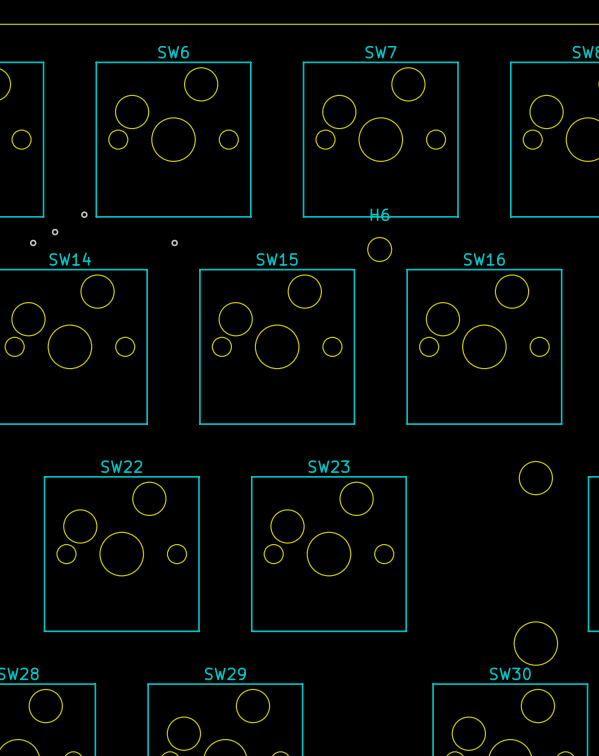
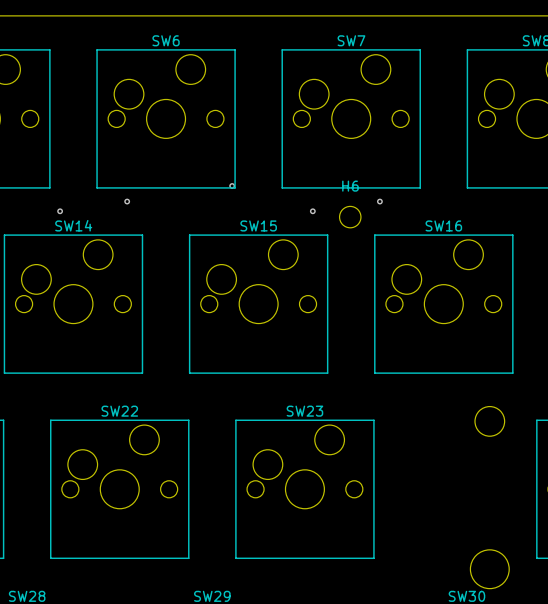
via: (84, 214) -> none
via: none -> (232, 186)
via: (55, 232) -> none
via: none -> (127, 201)
via: none -> (379, 201)
via: (33, 242) -> none
via: none -> (60, 211)
via: (174, 242) -> none
via: none -> (312, 211)

